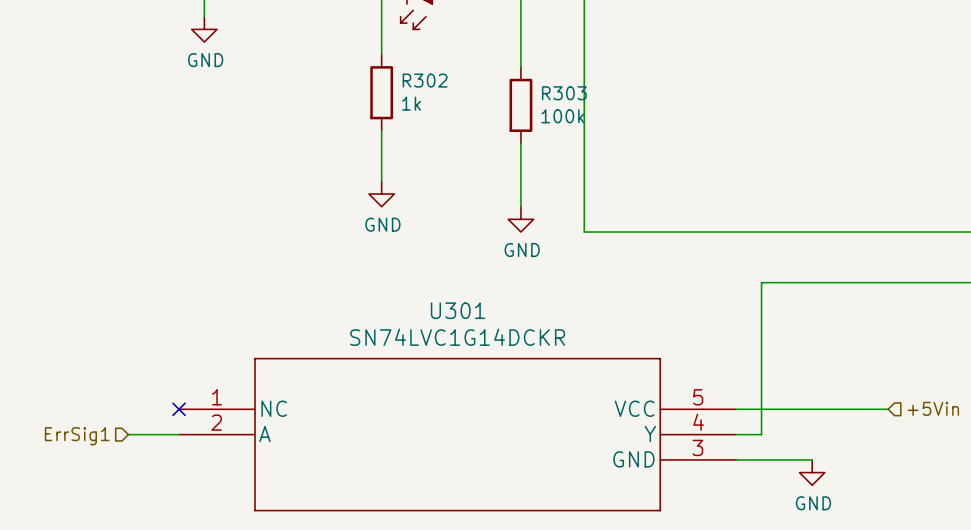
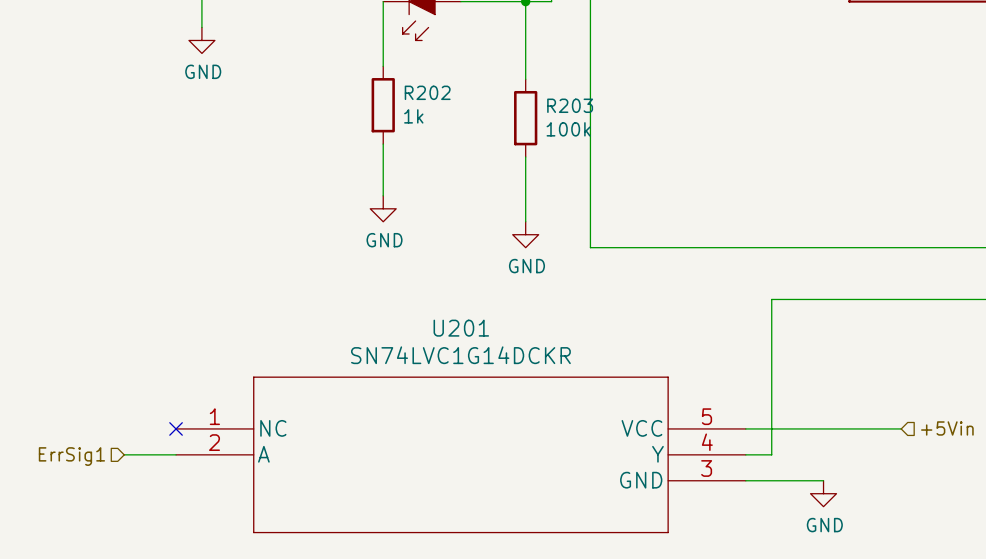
R302 name: R302 (425, 80) -> R202 (427, 92)
R303 name: R303 (564, 93) -> R203 (570, 105)
U301 name: U301 (457, 310) -> U201 (461, 328)

